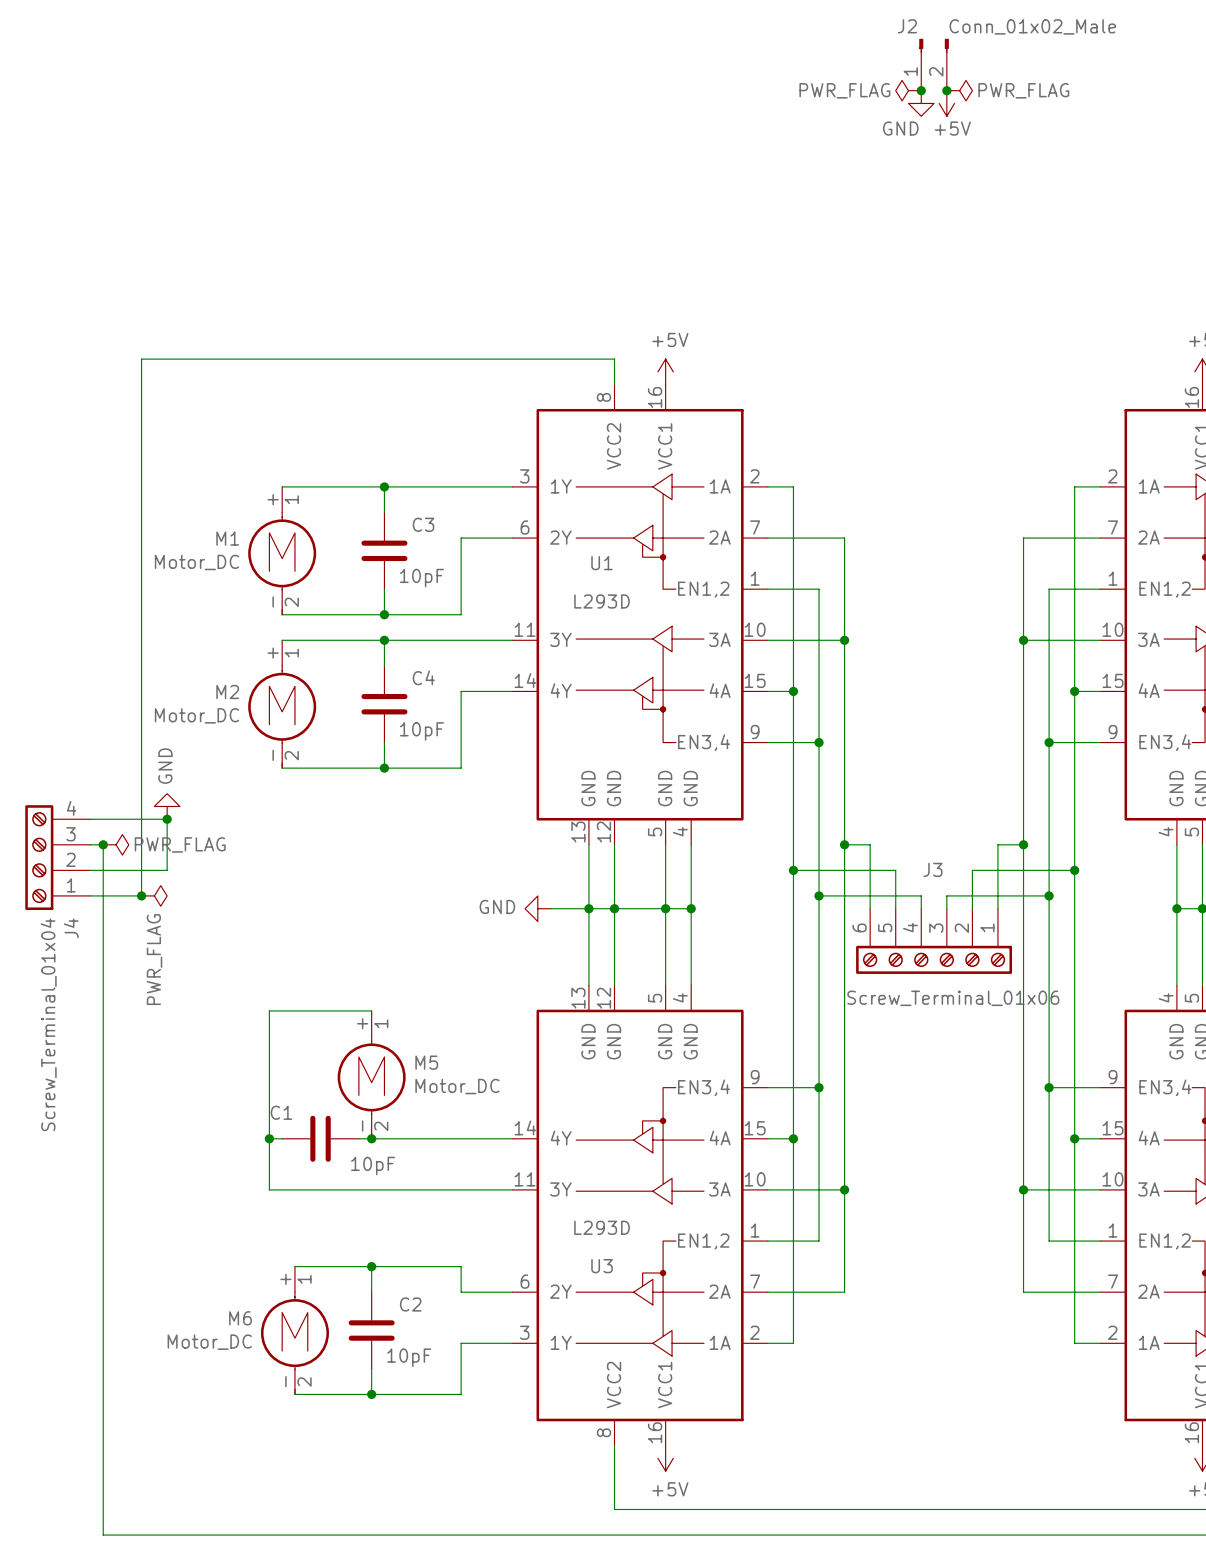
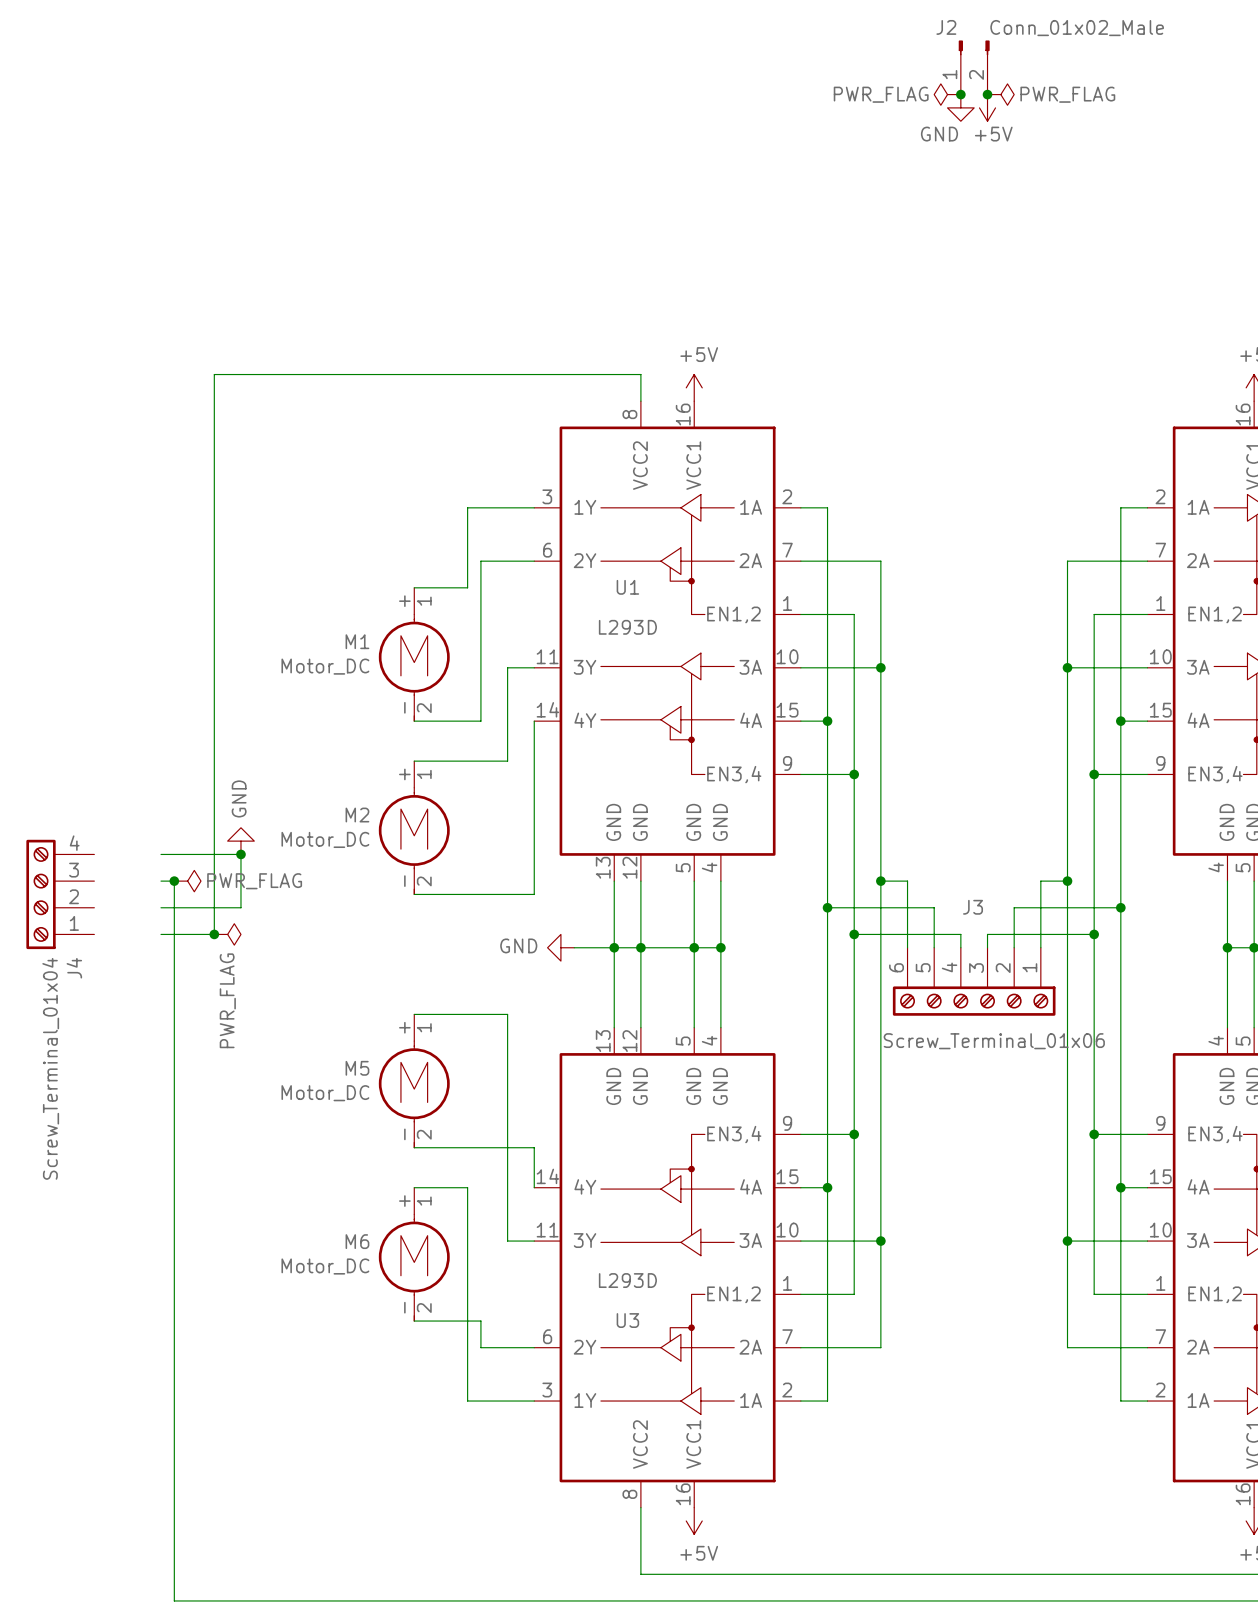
wire: (205, 359) (141, 359) (141, 895) (90, 895) -> (214, 374) (214, 934) (160, 934)
wire: (282, 486) (448, 486) -> (414, 587) (467, 587) (467, 507)
wire: (384, 486) (384, 512) -> none
junction: (384, 486) -> none
M1 position: (282, 550) -> (414, 654)
C3: 10pF (384, 550) -> none
wire: (384, 589) (384, 614) -> none
wire: (282, 614) (461, 614) -> (414, 721) (480, 721) (480, 641)
junction: (384, 614) -> none
wire: (282, 640) (486, 640) -> (414, 761) (507, 761) (507, 667)
wire: (384, 640) (384, 665) -> none
junction: (384, 640) -> none
wire: (512, 691) (461, 691) (461, 768) (282, 768) -> (534, 721) (534, 894) (414, 894)
M2 position: (282, 704) -> (414, 827)
C4: 10pF (384, 704) -> none
wire: (384, 742) (384, 768) -> none
junction: (384, 768) -> none
power symbol position: GND (167, 806) -> GND (240, 841)
wire: (90, 819) (154, 819) -> none
wire: (167, 819) (167, 844) -> (160, 881) (174, 881)
junction position: (167, 819) -> (174, 881)
junction: none -> (240, 854)
wire: (90, 844) (103, 844) (103, 1535) (167, 1535) -> (174, 854) (240, 854) (240, 907) (174, 907) (174, 1600)
junction: (103, 844) -> none
power symbol: PWR_FLAG (116, 844) -> none
power symbol: none -> PWR_FLAG (187, 881)
wire: (90, 870) (154, 870) -> none
junction: (141, 895) -> none
power symbol: PWR_FLAG (154, 895) -> none
junction: none -> (214, 934)
power symbol: none -> PWR_FLAG (227, 934)
wire: (371, 1010) (269, 1010) (269, 1189) (486, 1189) -> (414, 1014) (507, 1014) (507, 1241)
M5 name position: M5 (426, 1062) -> M5 (357, 1068)
M5 position: (371, 1074) -> (414, 1081)
M5 value position: Motor_DC (457, 1086) -> Motor_DC (325, 1093)
wire: (269, 1138) (282, 1138) -> none
junction: (269, 1138) -> none
C1: 10pF (320, 1138) -> none
wire: (358, 1138) (397, 1138) -> none
junction: (371, 1138) -> none
wire: (448, 1138) (512, 1138) -> (414, 1147) (534, 1147) (534, 1187)
wire: (294, 1266) (397, 1266) -> none
wire: (371, 1266) (371, 1292) -> none
junction: (371, 1266) -> none
M6 position: (294, 1330) -> (414, 1254)
C2: 10pF (371, 1330) -> none
wire: (461, 1343) (461, 1394) (294, 1394) -> (480, 1401) (467, 1401) (467, 1187)
wire: (371, 1368) (371, 1394) -> none
junction: (371, 1394) -> none

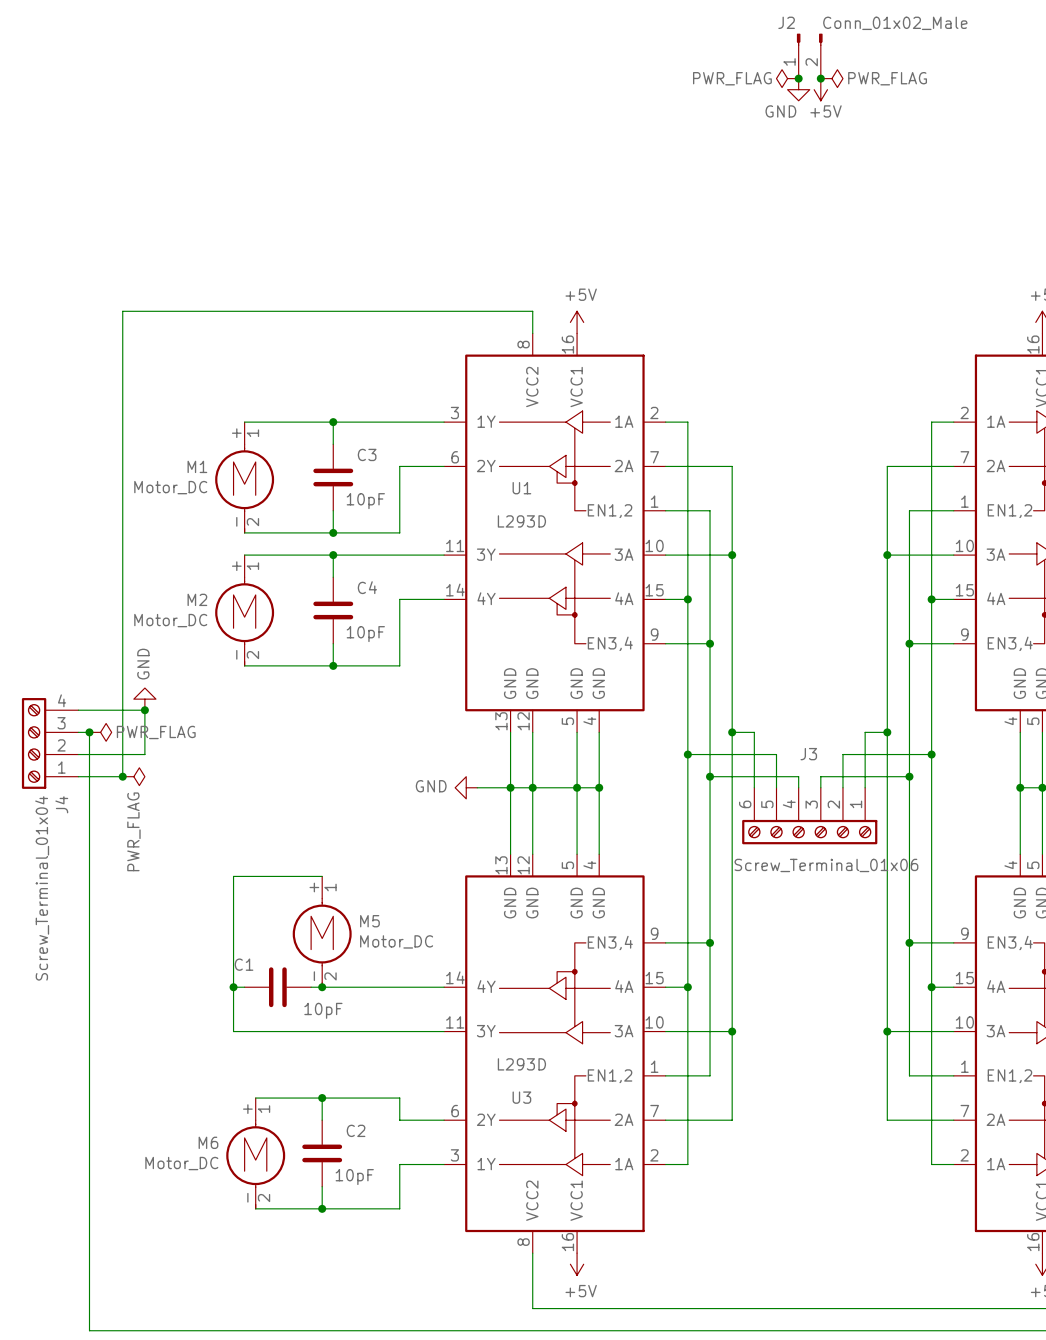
wire: (214, 374) (214, 934) (160, 934) -> (178, 311) (122, 311) (122, 776) (78, 776)
wire: none -> (333, 422) (333, 444)
junction: none -> (333, 422)
wire: (467, 507) (467, 587) (414, 587) -> (388, 422) (244, 422)
C3: none -> 10pF (333, 477)
wire: none -> (333, 510) (333, 532)
junction: none -> (333, 532)
wire: (480, 641) (480, 721) (414, 721) -> (399, 532) (244, 532)
M1 position: (414, 654) -> (244, 477)
wire: none -> (333, 555) (333, 577)
junction: none -> (333, 555)
wire: (507, 667) (507, 761) (414, 761) -> (421, 555) (244, 555)
wire: (534, 721) (534, 894) (414, 894) -> (444, 599) (399, 599) (399, 665) (244, 665)
C4: none -> 10pF (333, 610)
wire: none -> (333, 643) (333, 665)
junction: none -> (333, 665)
M2 position: (414, 827) -> (244, 610)
power symbol position: GND (240, 841) -> GND (144, 699)
wire: none -> (78, 710) (133, 710)
wire: (174, 854) (240, 854) (240, 907) (174, 907) (174, 1600) -> (78, 732) (89, 732) (89, 1330) (144, 1330)
junction: (240, 854) -> none
junction: none -> (89, 732)
power symbol: none -> PWR_FLAG (100, 732)
wire: (160, 881) (174, 881) -> (144, 710) (144, 732)
junction position: (174, 881) -> (144, 710)
power symbol: PWR_FLAG (187, 881) -> none
wire: none -> (78, 754) (133, 754)
junction: none -> (122, 776)
power symbol: none -> PWR_FLAG (133, 776)
junction: (214, 934) -> none
power symbol: PWR_FLAG (227, 934) -> none
wire: (414, 1014) (507, 1014) (507, 1241) -> (322, 876) (233, 876) (233, 1031) (421, 1031)
M5 name position: M5 (357, 1068) -> M5 (369, 921)
M5 position: (414, 1081) -> (322, 931)
M5 value position: Motor_DC (325, 1093) -> Motor_DC (396, 941)
wire: (414, 1147) (534, 1147) (534, 1187) -> (388, 987) (444, 987)
wire: none -> (233, 987) (244, 987)
junction: none -> (233, 987)
C1: none -> 10pF (277, 987)
wire: none -> (311, 987) (344, 987)
junction: none -> (322, 987)
wire: (467, 1187) (467, 1401) (480, 1401) -> (255, 1208) (399, 1208) (399, 1164)
M6 position: (414, 1254) -> (255, 1153)
wire: none -> (255, 1098) (344, 1098)
wire: none -> (322, 1098) (322, 1120)
junction: none -> (322, 1098)
C2: none -> 10pF (322, 1153)
wire: none -> (322, 1186) (322, 1208)
junction: none -> (322, 1208)

